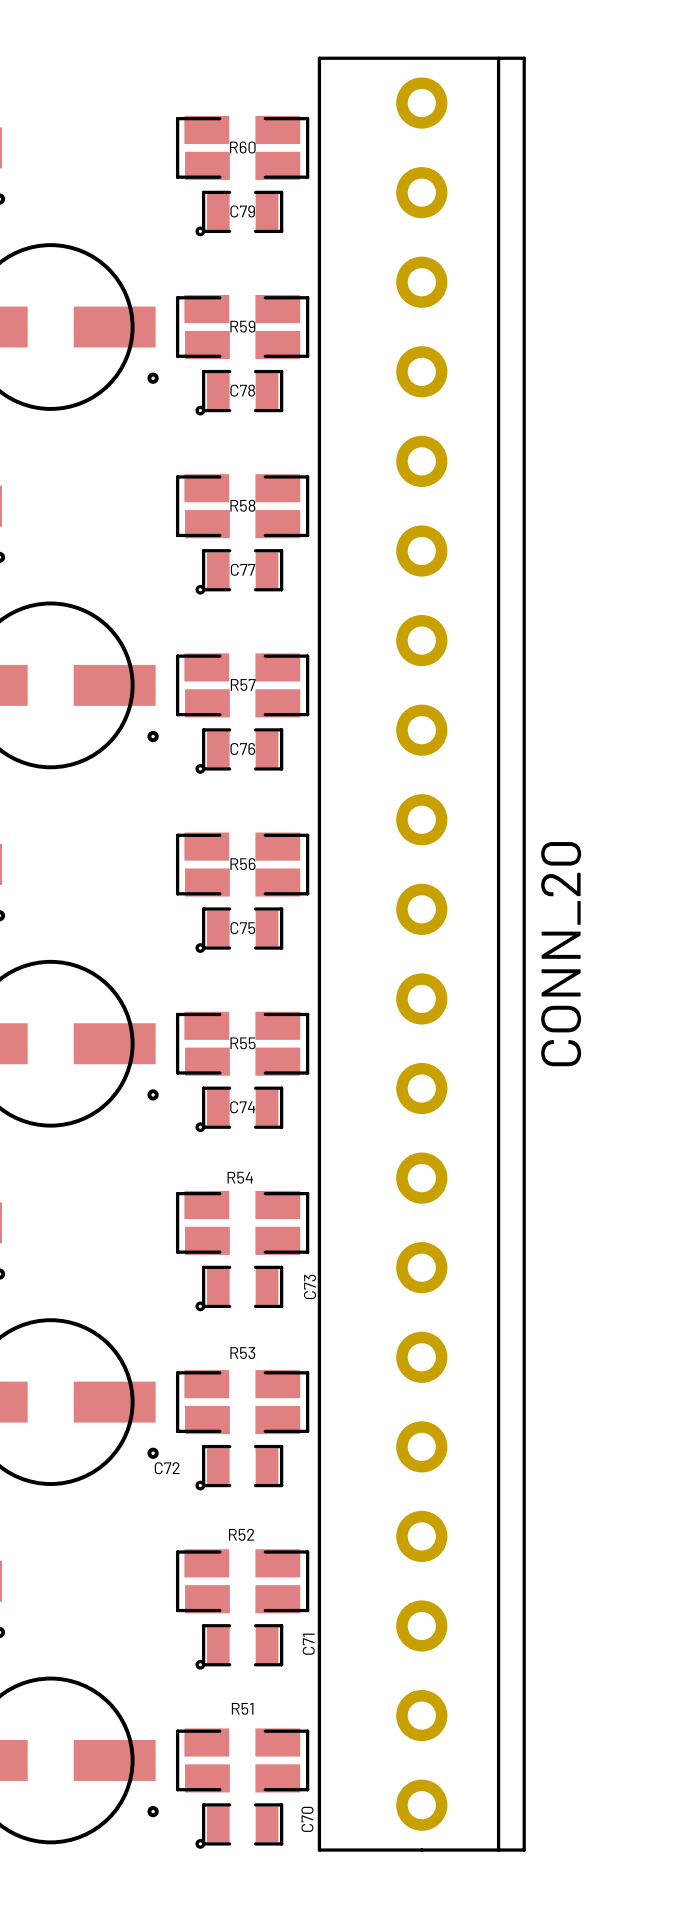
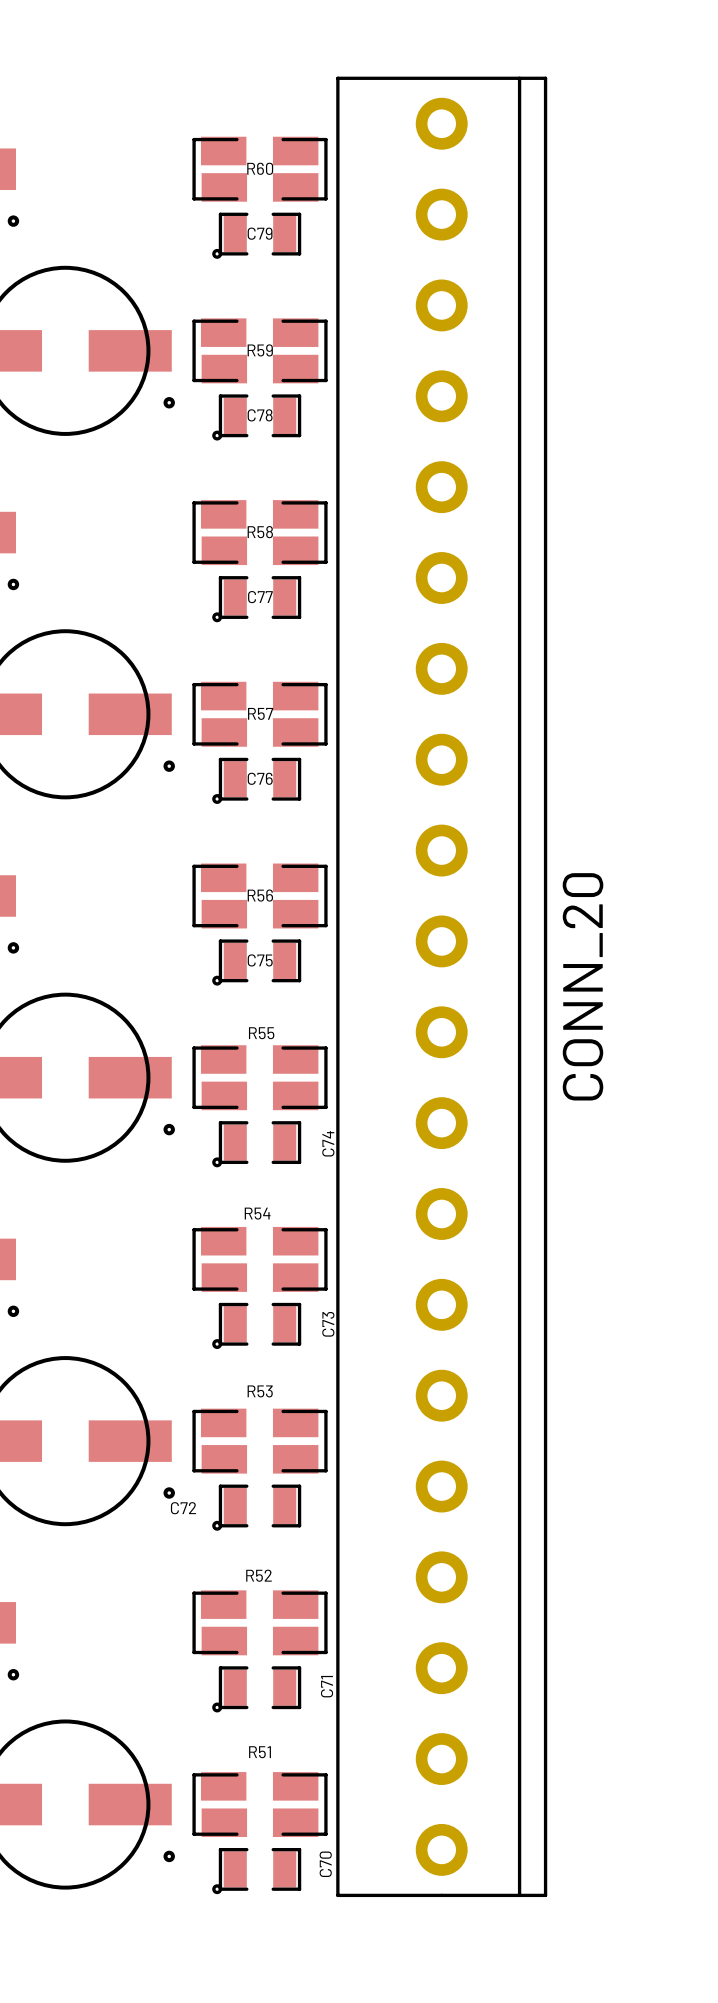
R55 name position: R55 (242, 1043) -> R55 (261, 1033)
C74 name rotation: 0° (242, 1107) -> 90° counterclockwise (328, 1143)
C74 name position: C74 (242, 1107) -> C74 (328, 1143)

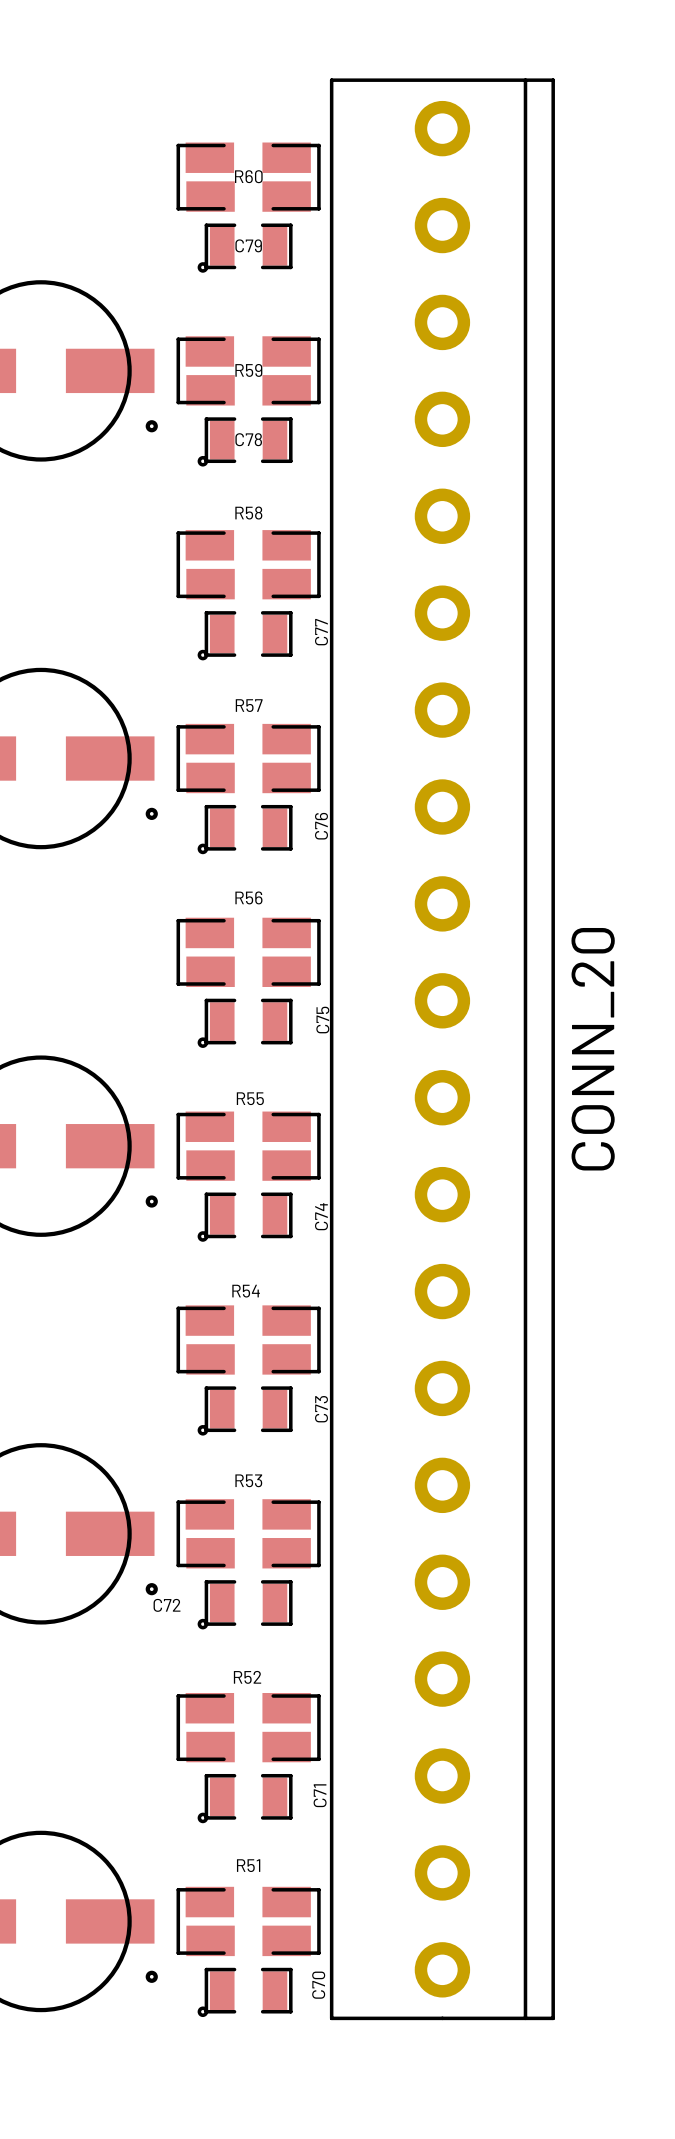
R58 name position: R58 (260, 532) -> R58 (248, 513)
C77 name rotation: 0° (260, 597) -> 90° counterclockwise (321, 632)
C77 name position: C77 (260, 597) -> C77 (321, 632)
R57 name position: R57 (260, 713) -> R57 (249, 705)
C76 name rotation: 0° (260, 778) -> 90° counterclockwise (321, 826)
C76 name position: C76 (260, 778) -> C76 (321, 826)
R56 name position: R56 (260, 895) -> R56 (248, 897)
C75 name rotation: 0° (260, 960) -> 90° counterclockwise (322, 1020)
C75 name position: C75 (260, 960) -> C75 (322, 1020)

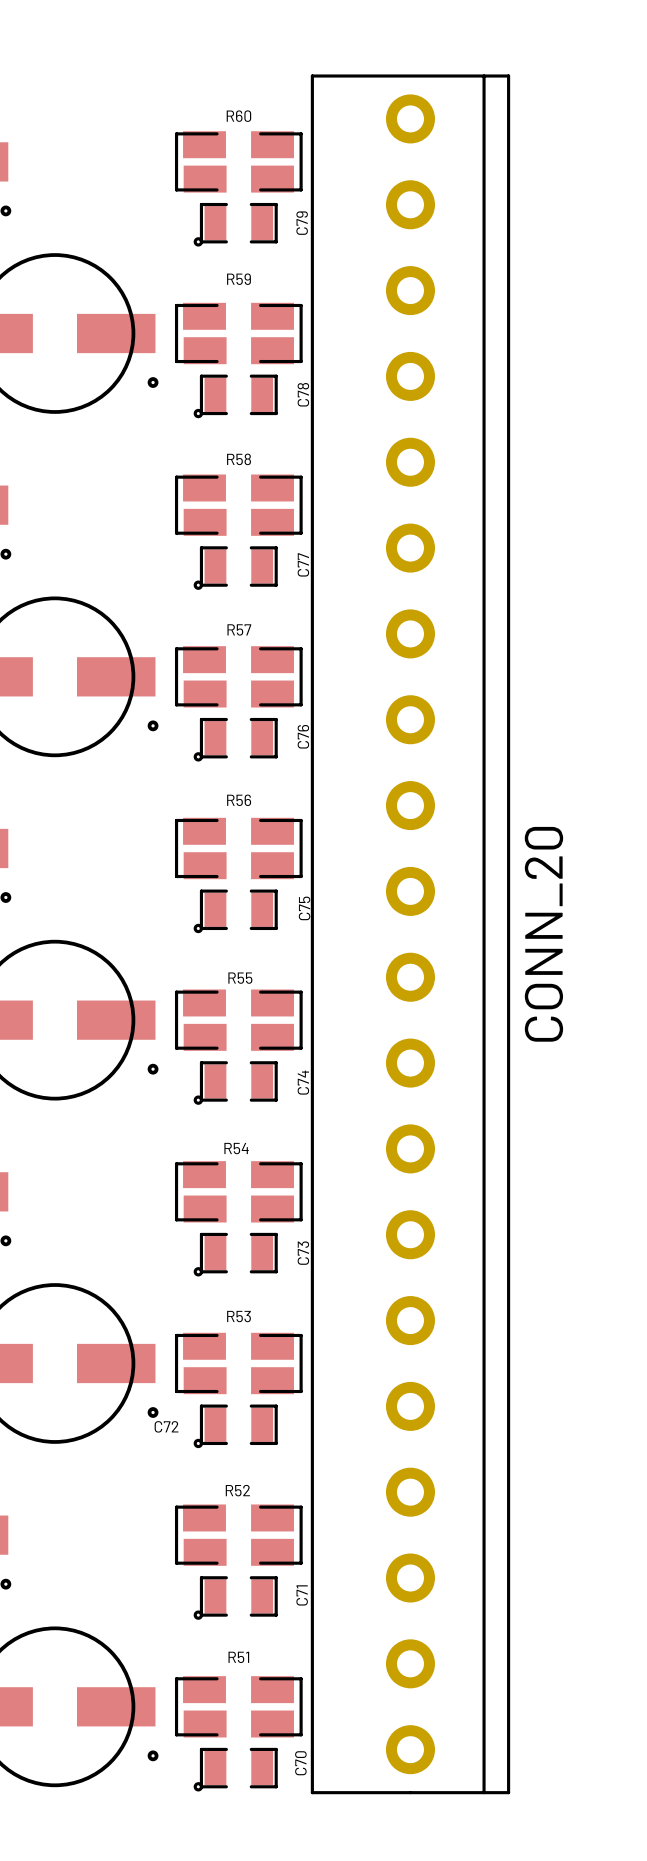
R60 name position: R60 (248, 176) -> R60 (238, 116)
C79 name rotation: 0° (248, 245) -> 90° counterclockwise (302, 223)
C79 name position: C79 (248, 245) -> C79 (302, 223)
R59 name position: R59 (248, 370) -> R59 (238, 279)
C78 name rotation: 0° (248, 439) -> 90° counterclockwise (303, 394)
C78 name position: C78 (248, 439) -> C78 (303, 394)

